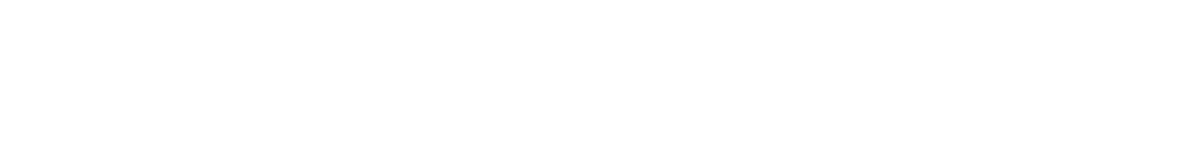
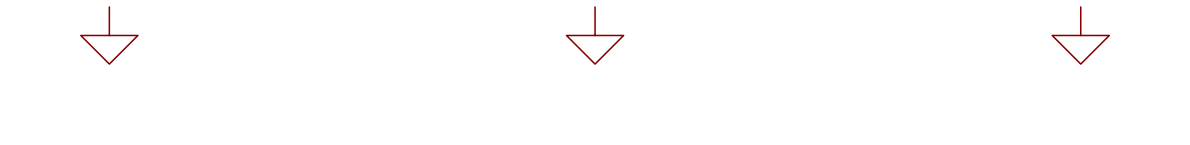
power symbol: none -> (109, 35)
power symbol: none -> (595, 35)
power symbol: none -> (1080, 35)

